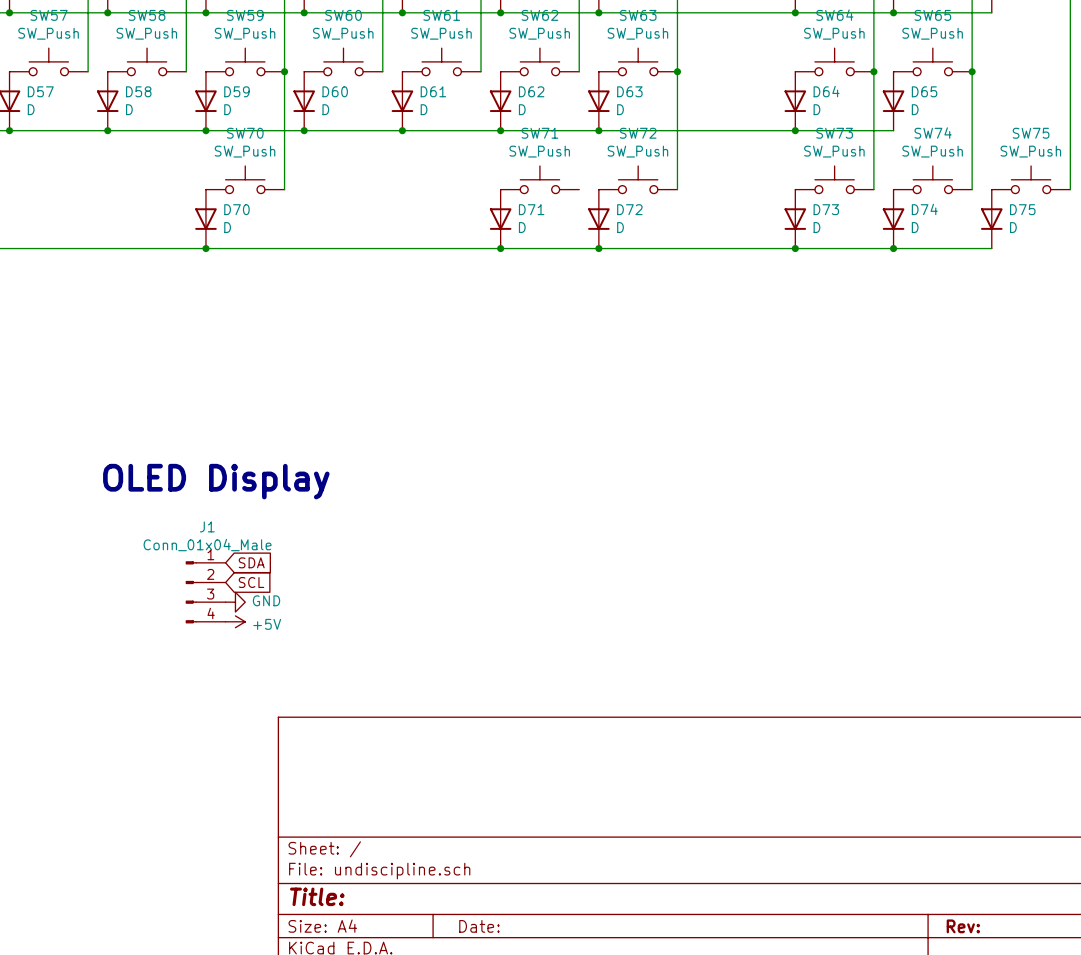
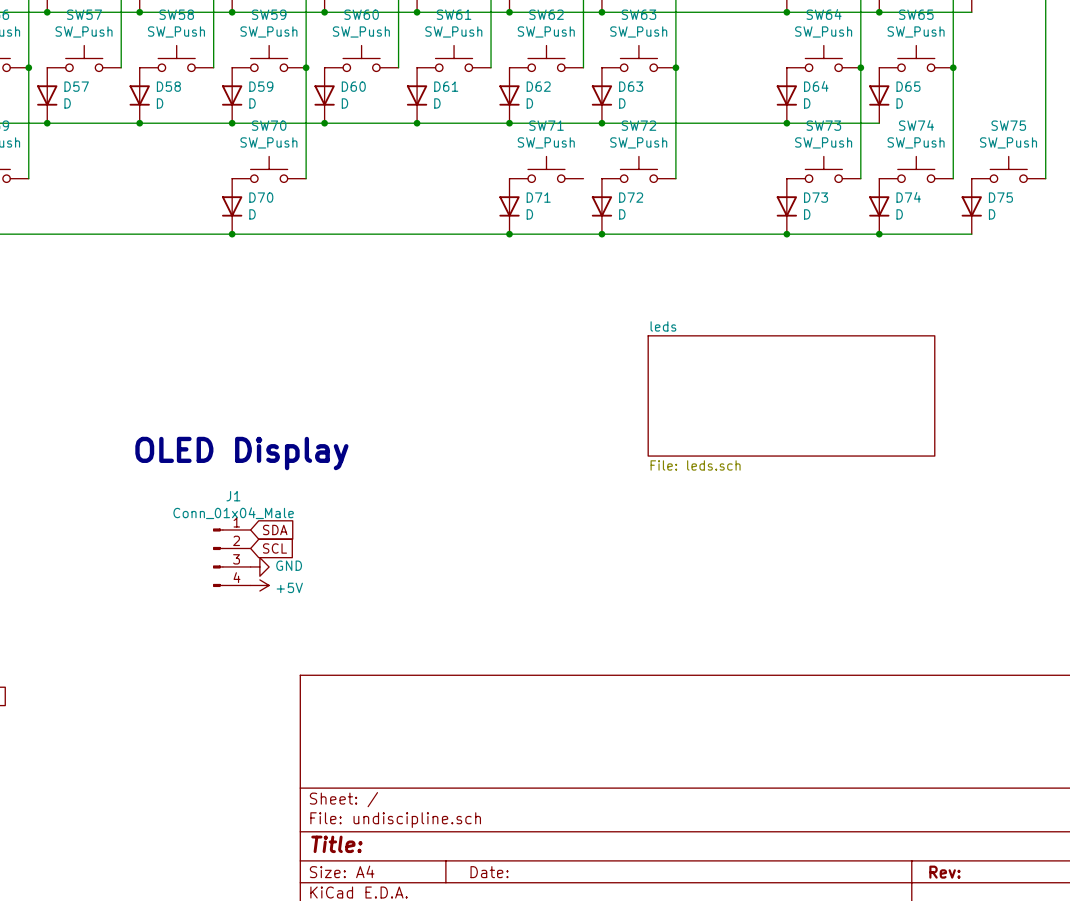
sheet leds: none -> File: leds.sch (791, 395)

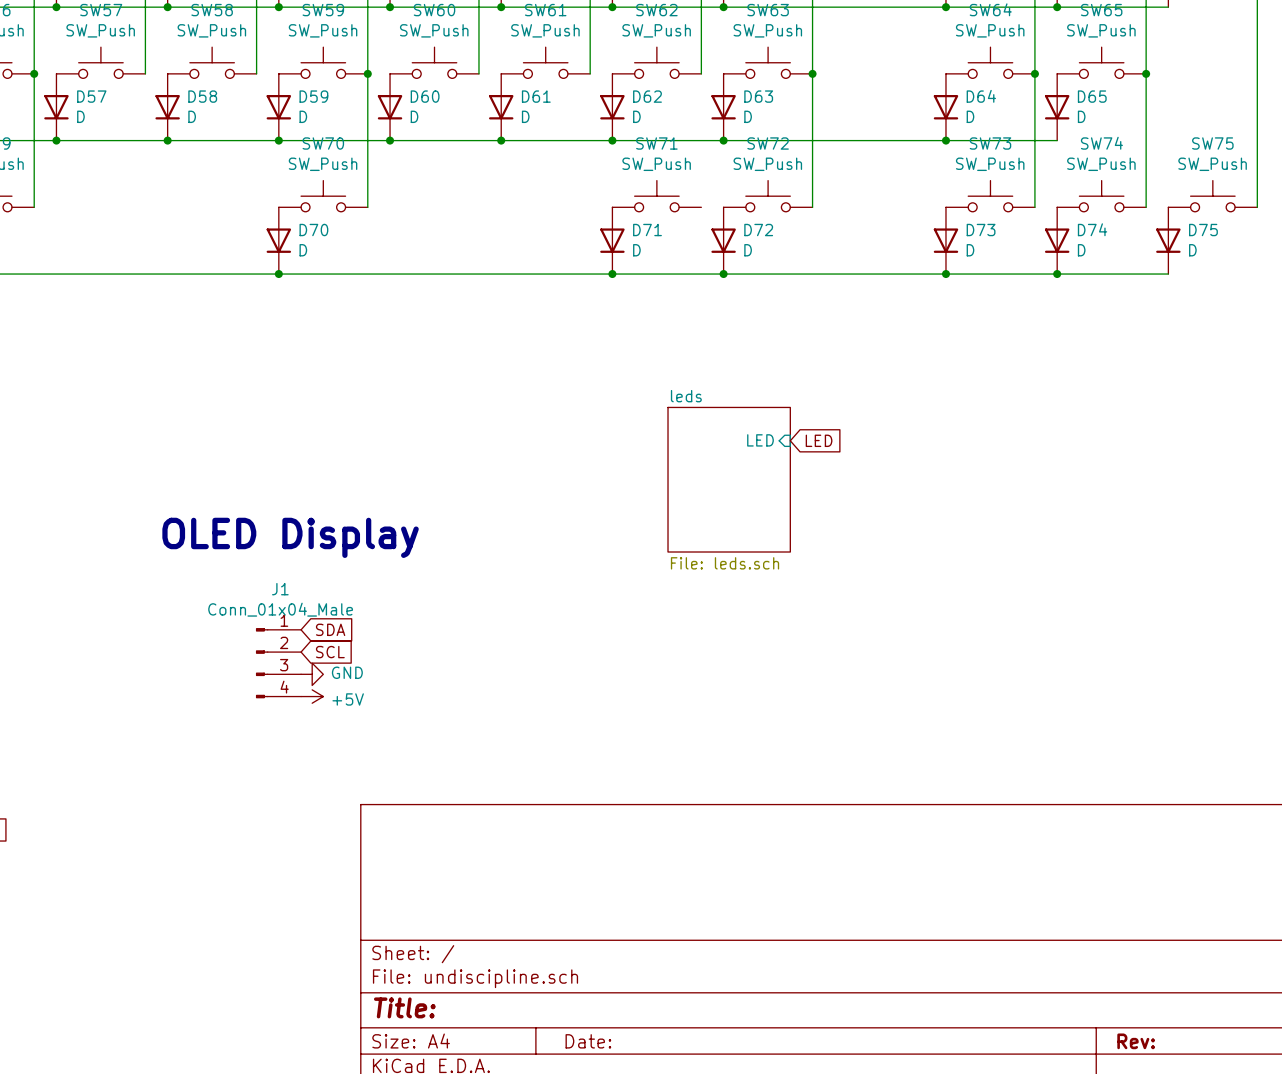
sheet pin: none -> LED (760, 440)
global label: none -> LED (819, 440)
sheet leds: File: leds.sch (791, 395) -> none
sheet leds: none -> File: leds.sch (729, 479)

